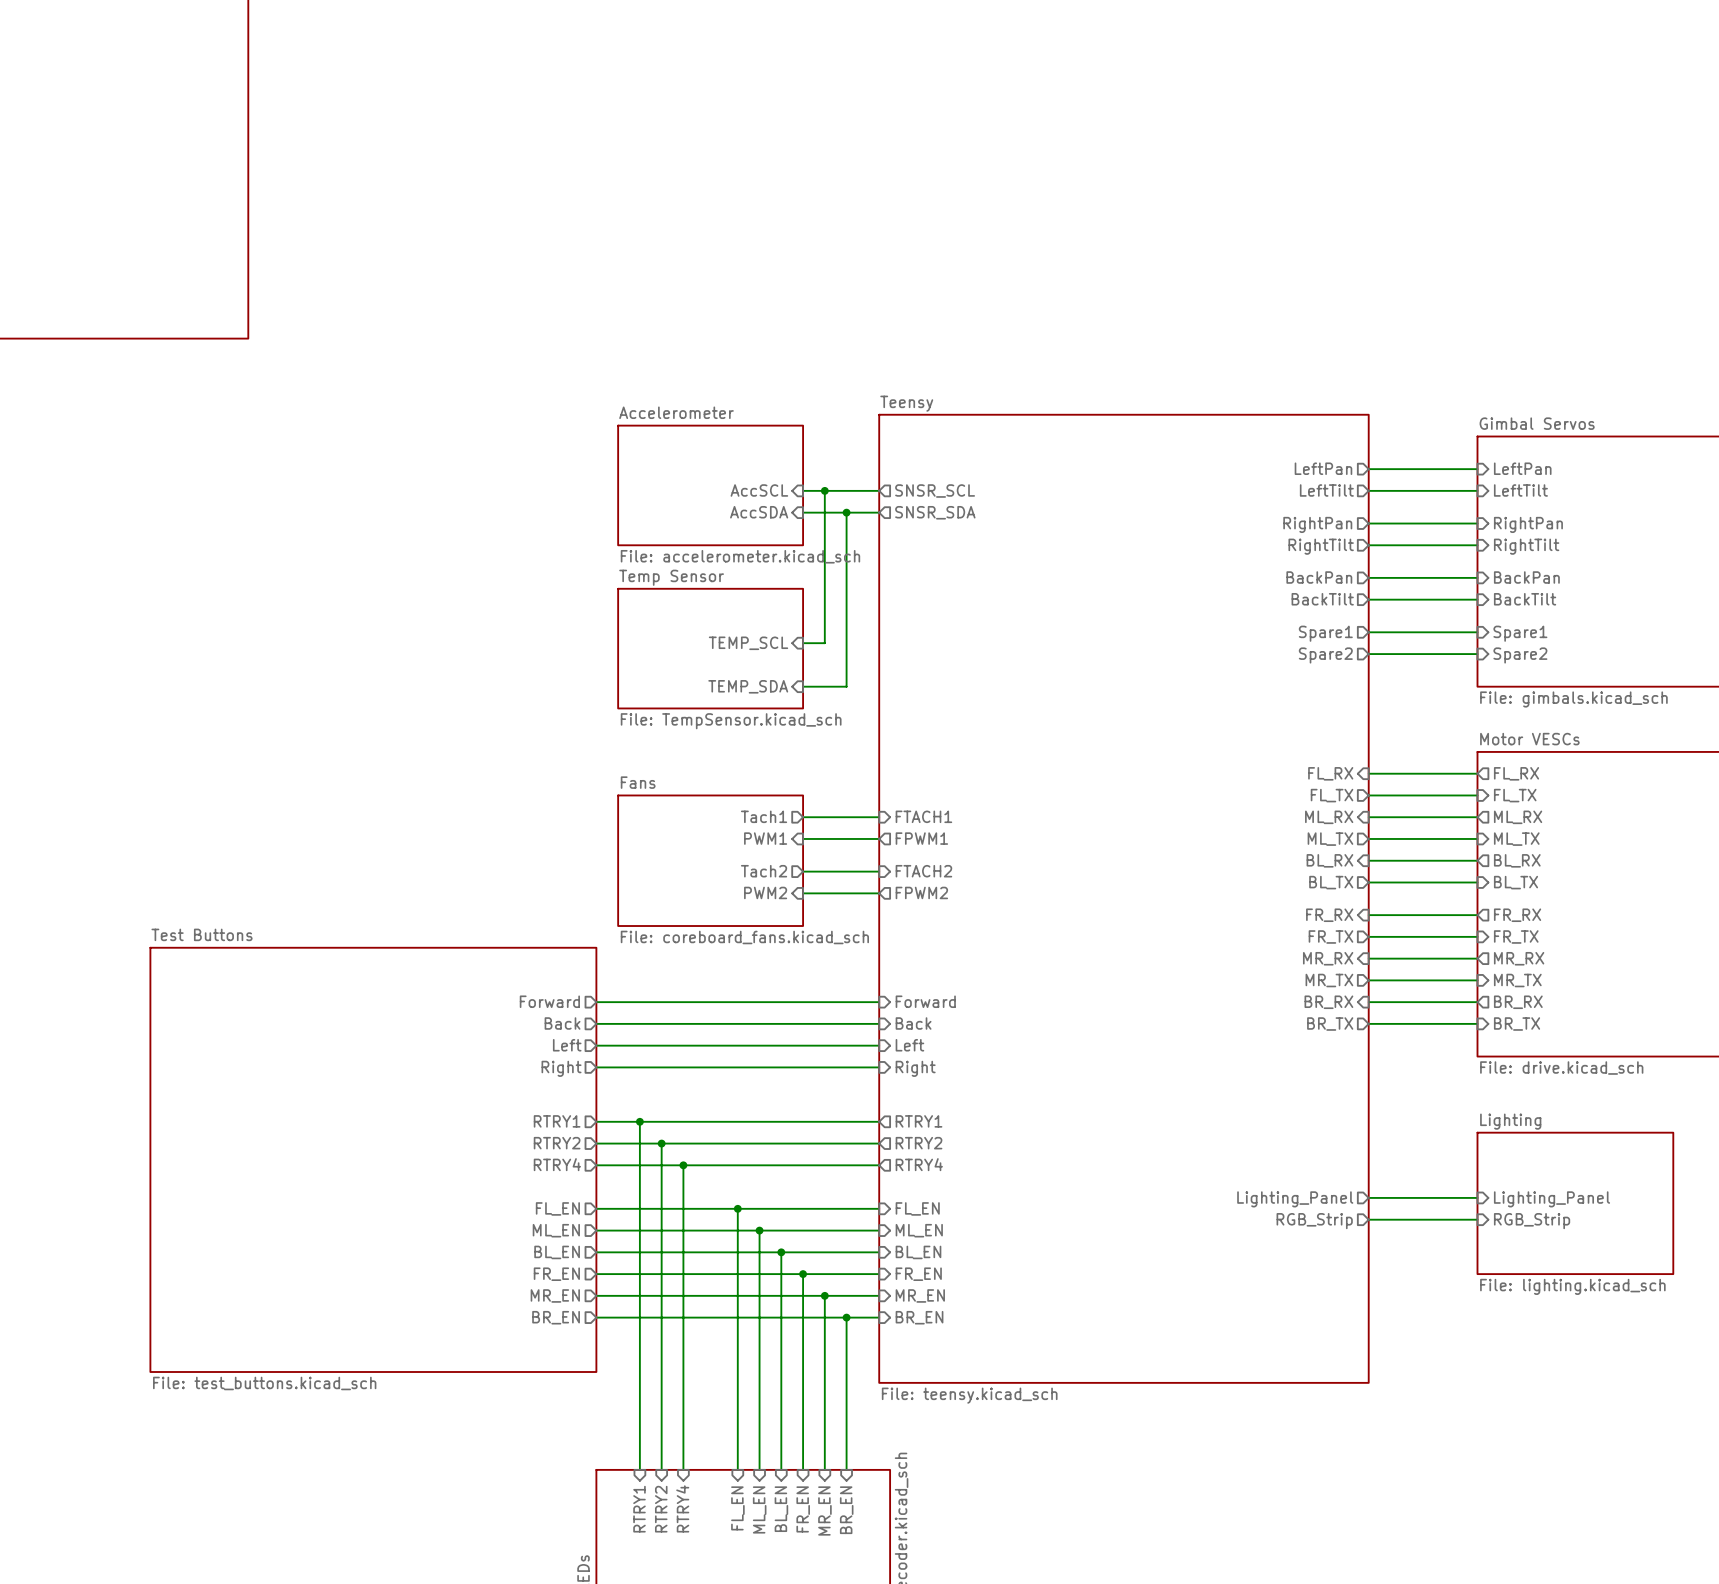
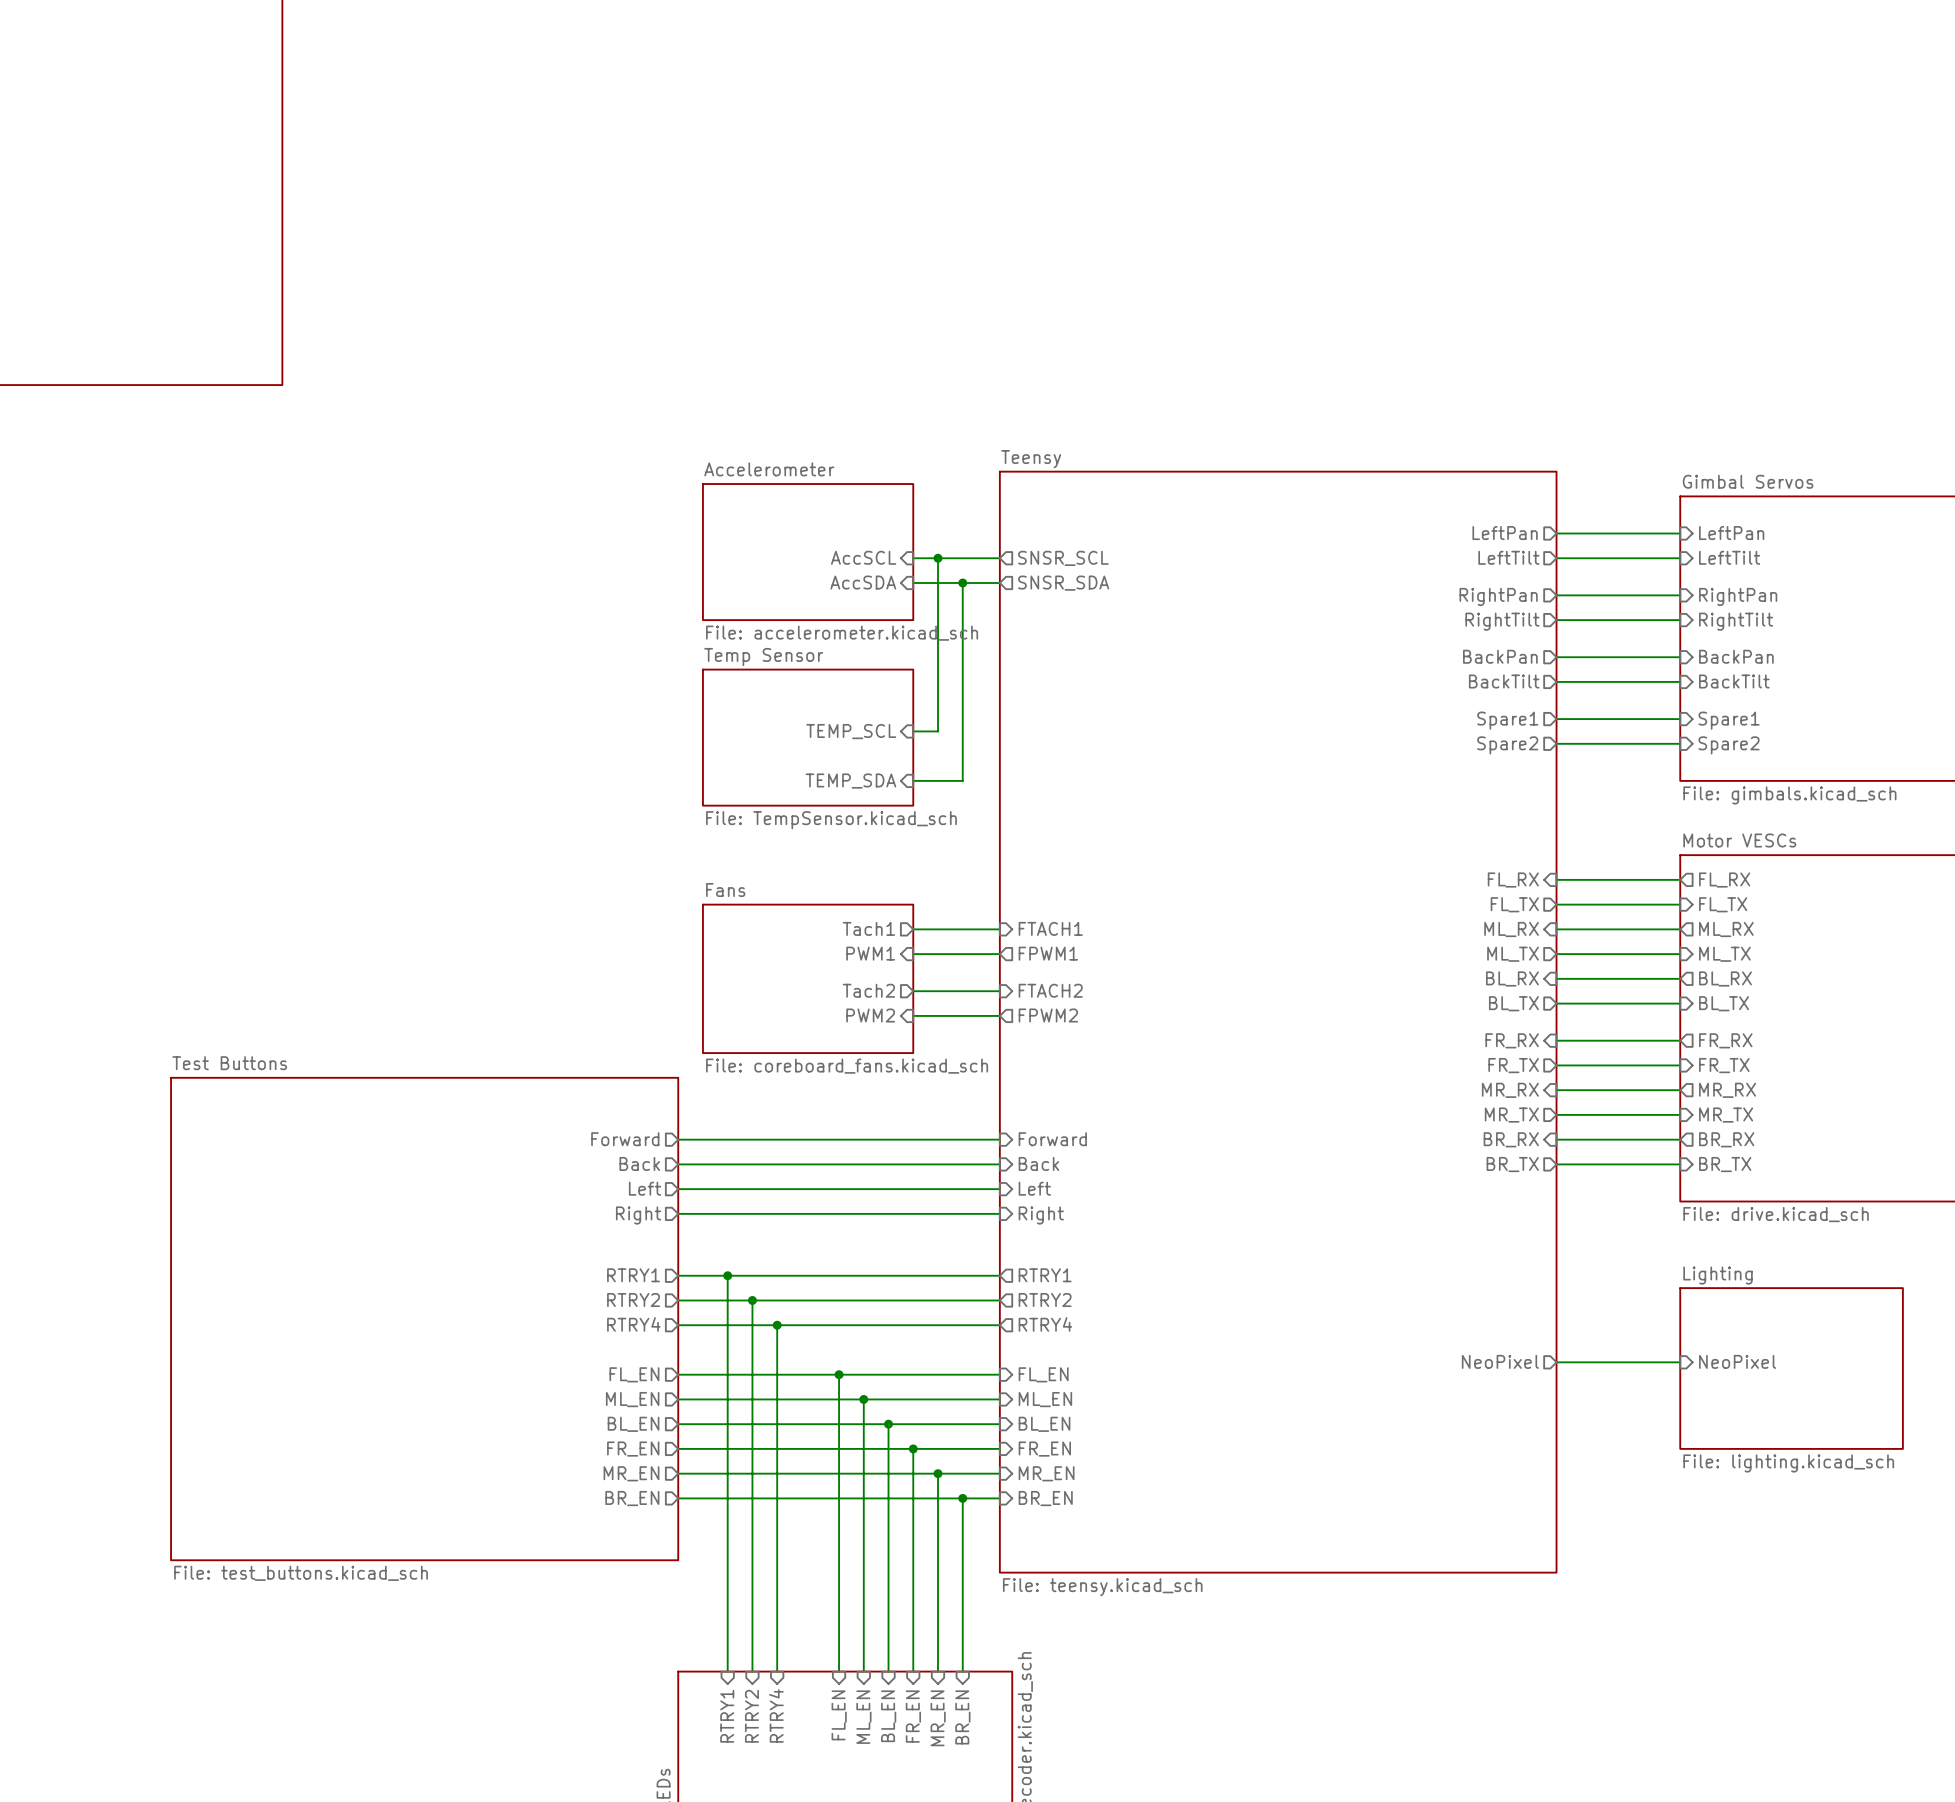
sheet pin: Lighting_Panel (1295, 1199) -> NeoPixel (1500, 1361)
sheet pin: Lighting_Panel (1551, 1199) -> NeoPixel (1737, 1361)
wire: (1368, 1219) (1477, 1219) -> none
sheet pin: RGB_Strip (1314, 1221) -> none
sheet pin: RGB_Strip (1532, 1221) -> none

